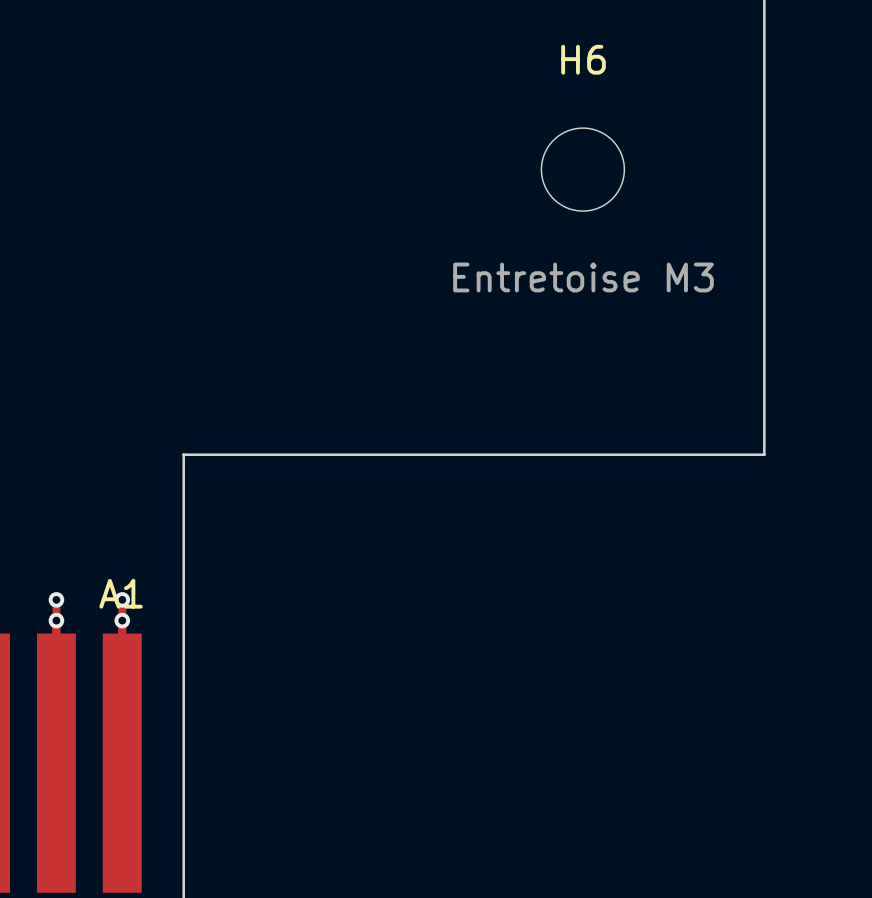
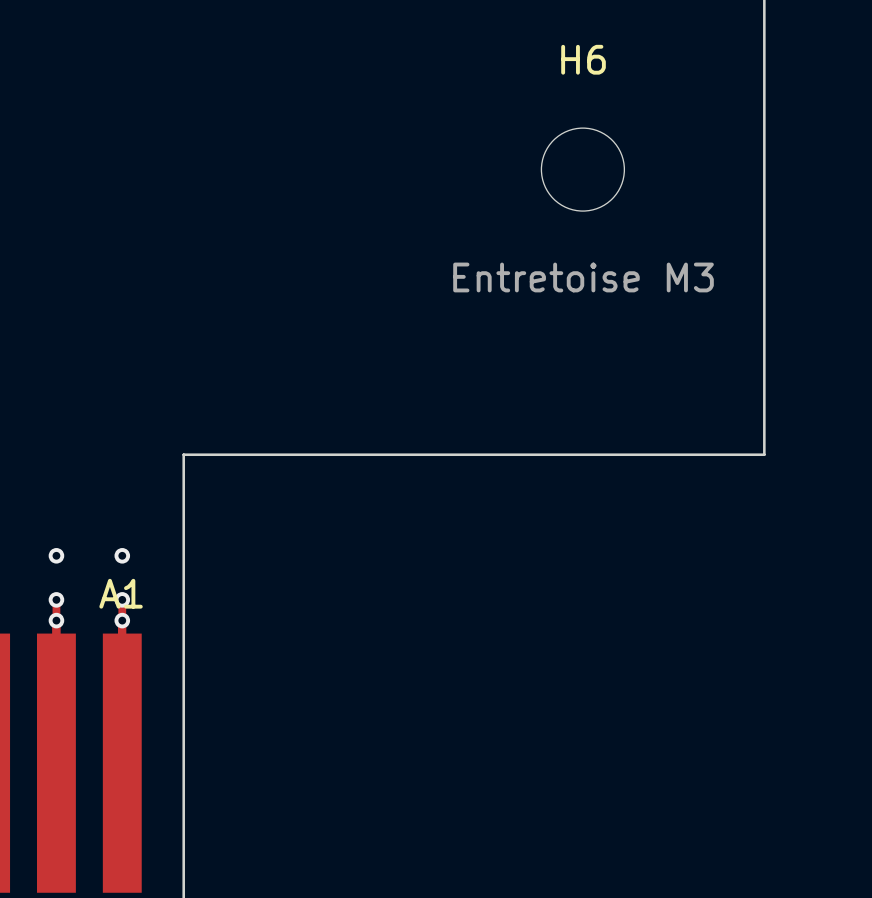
via: none -> (56, 555)
via: none -> (122, 555)

